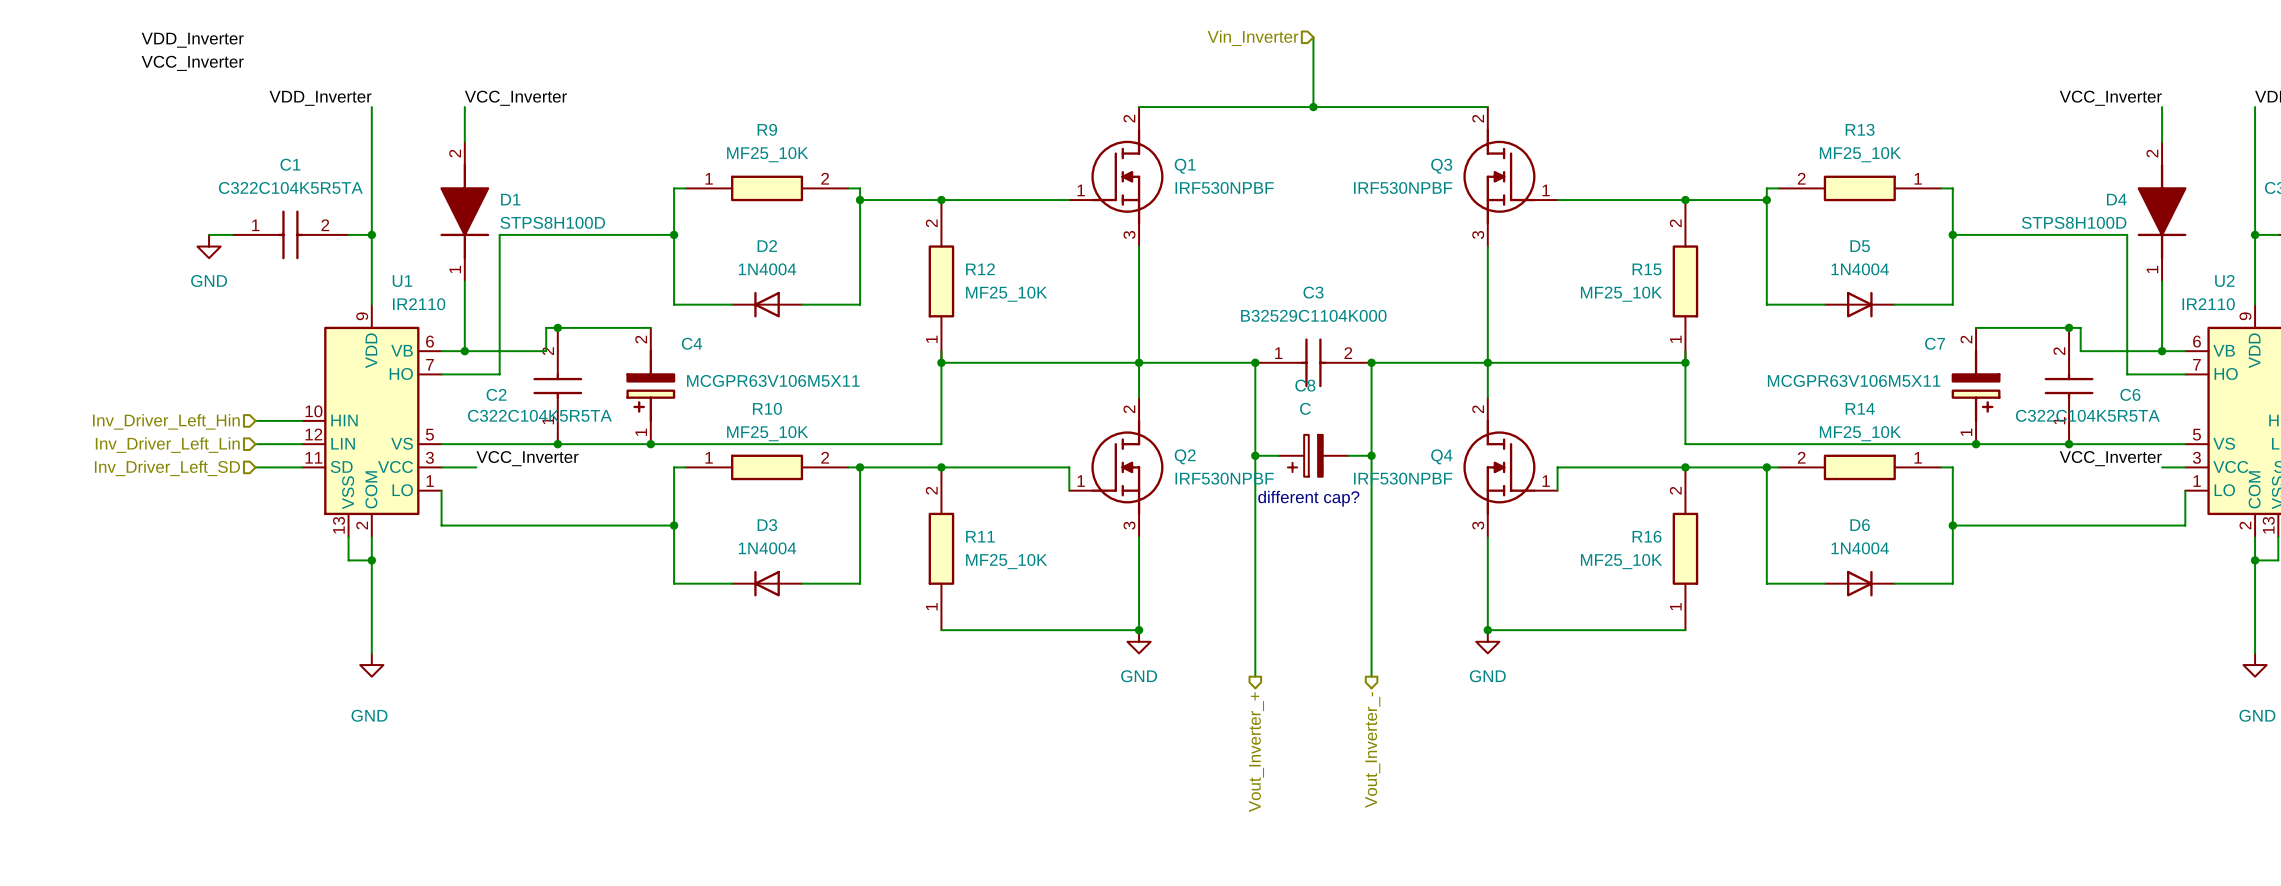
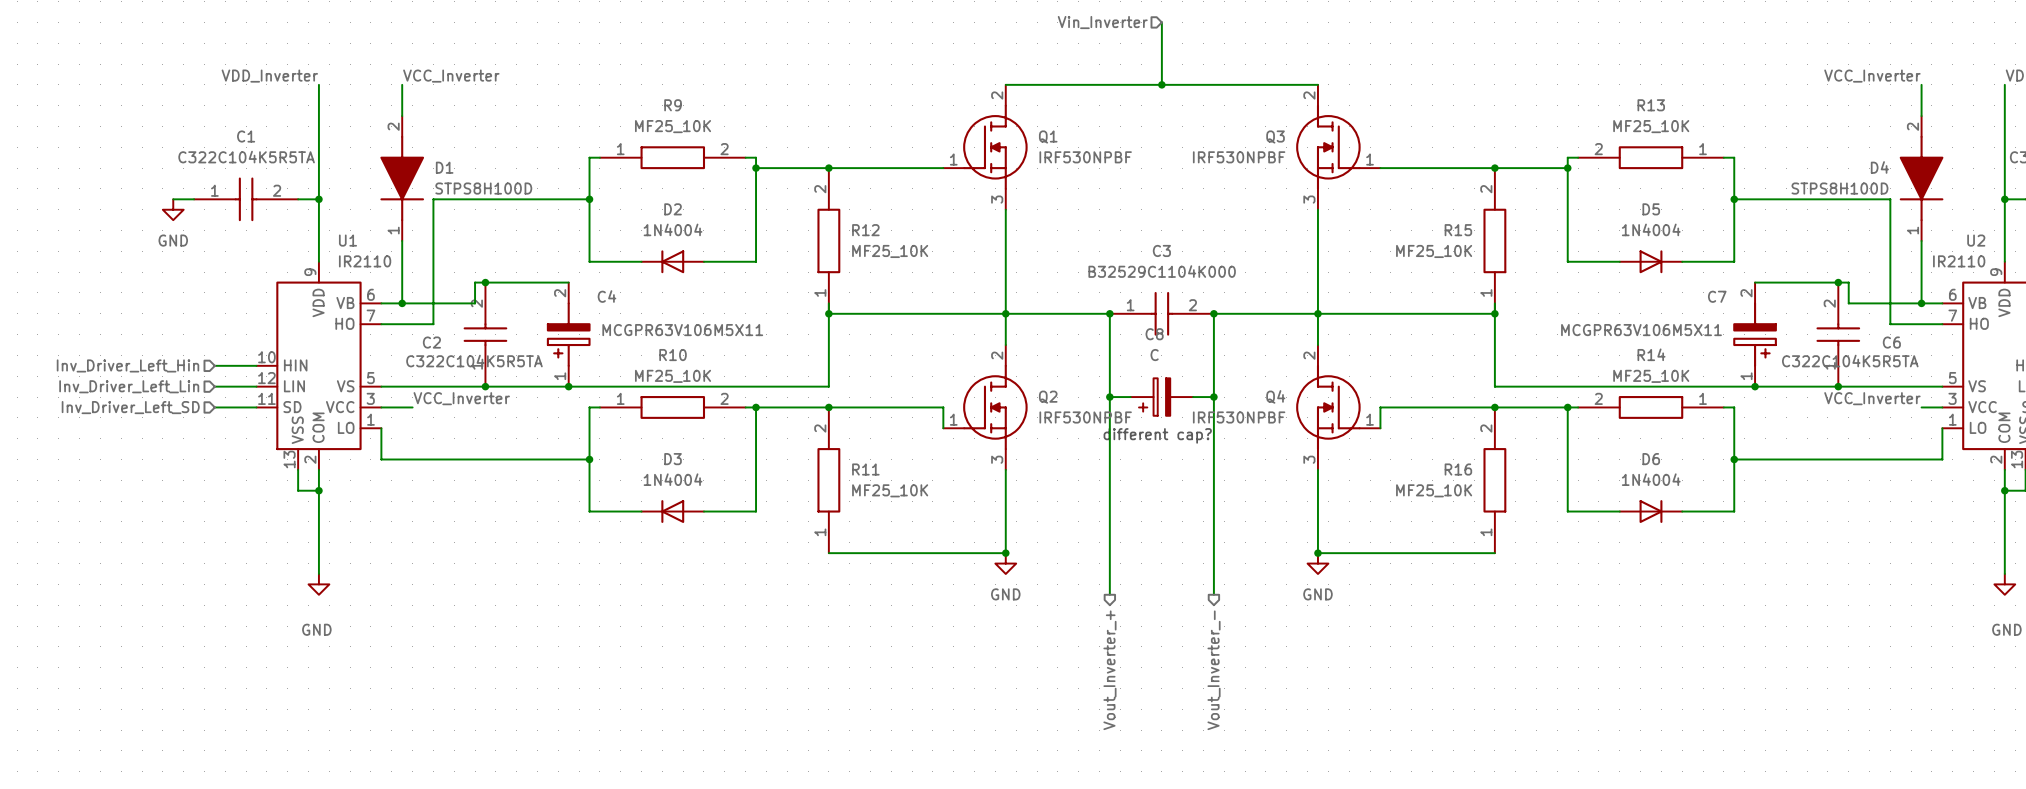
label: VDD_Inverter (192, 40) -> none
label: VCC_Inverter (192, 63) -> none

